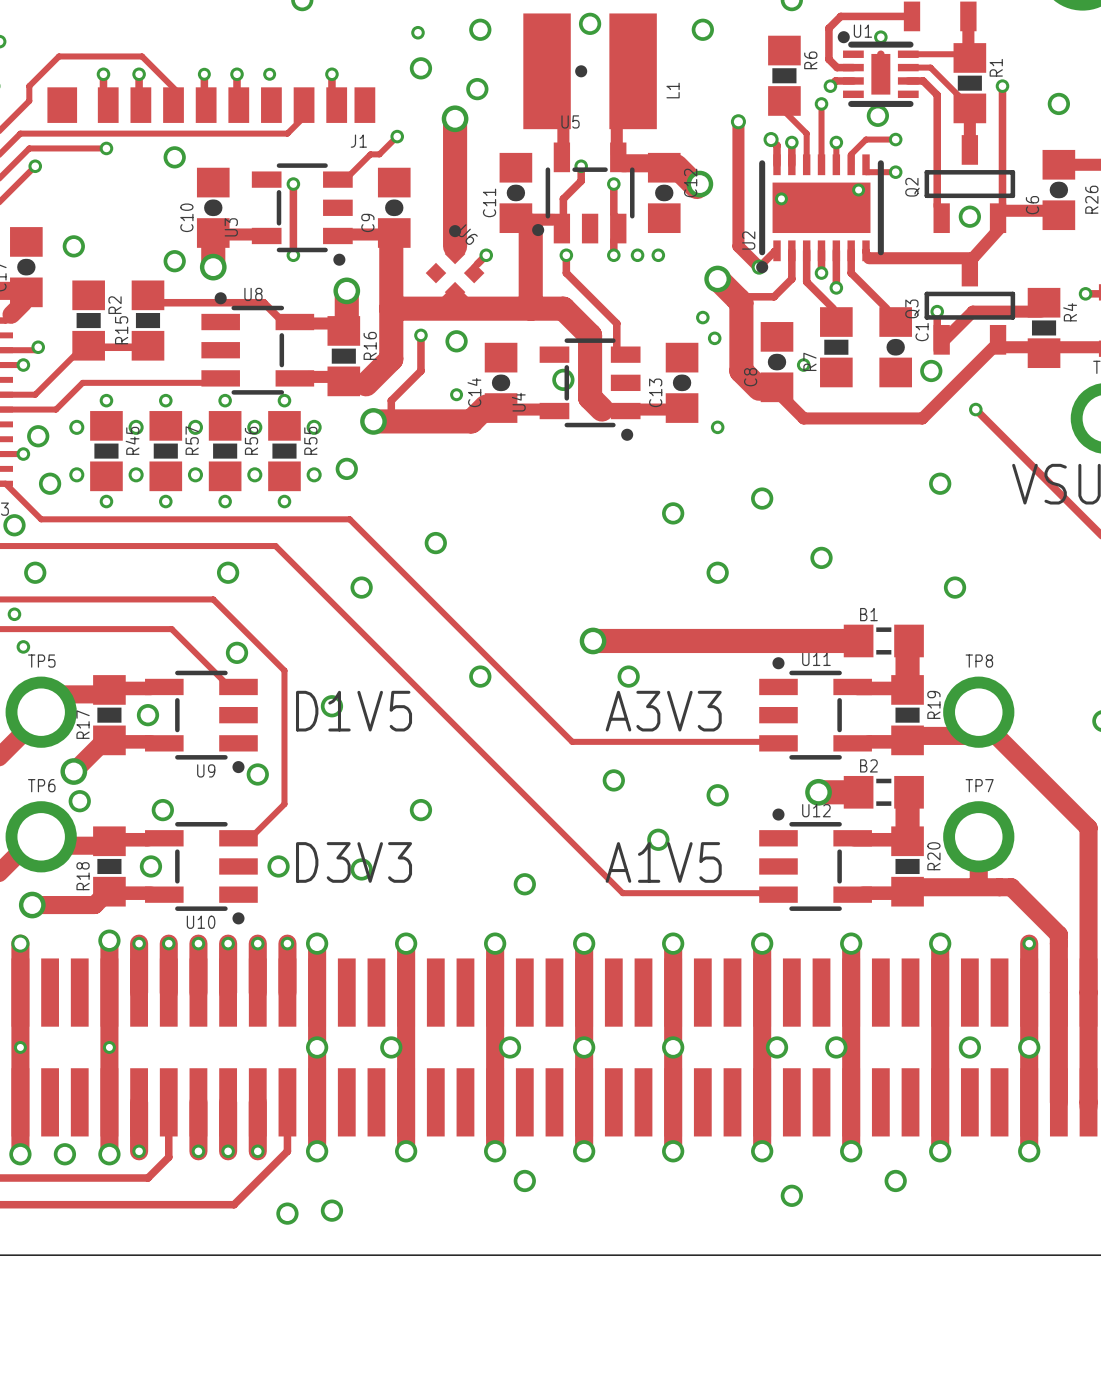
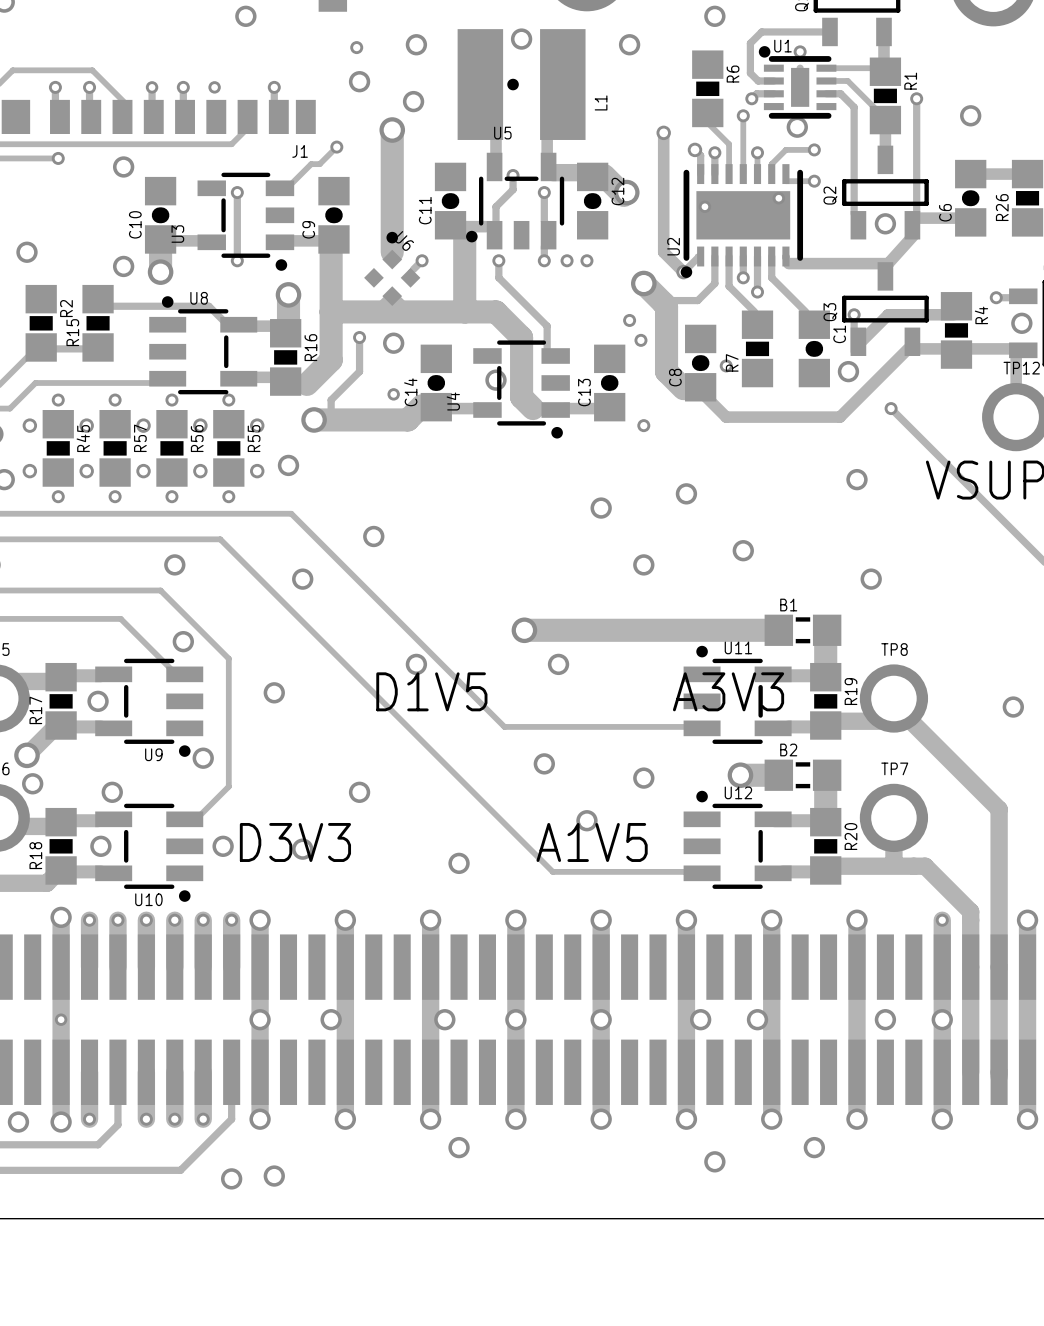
text position: D1V5 (354, 711) -> D1V5 (431, 691)
text position: A3V3 (663, 711) -> A3V3 (728, 691)

